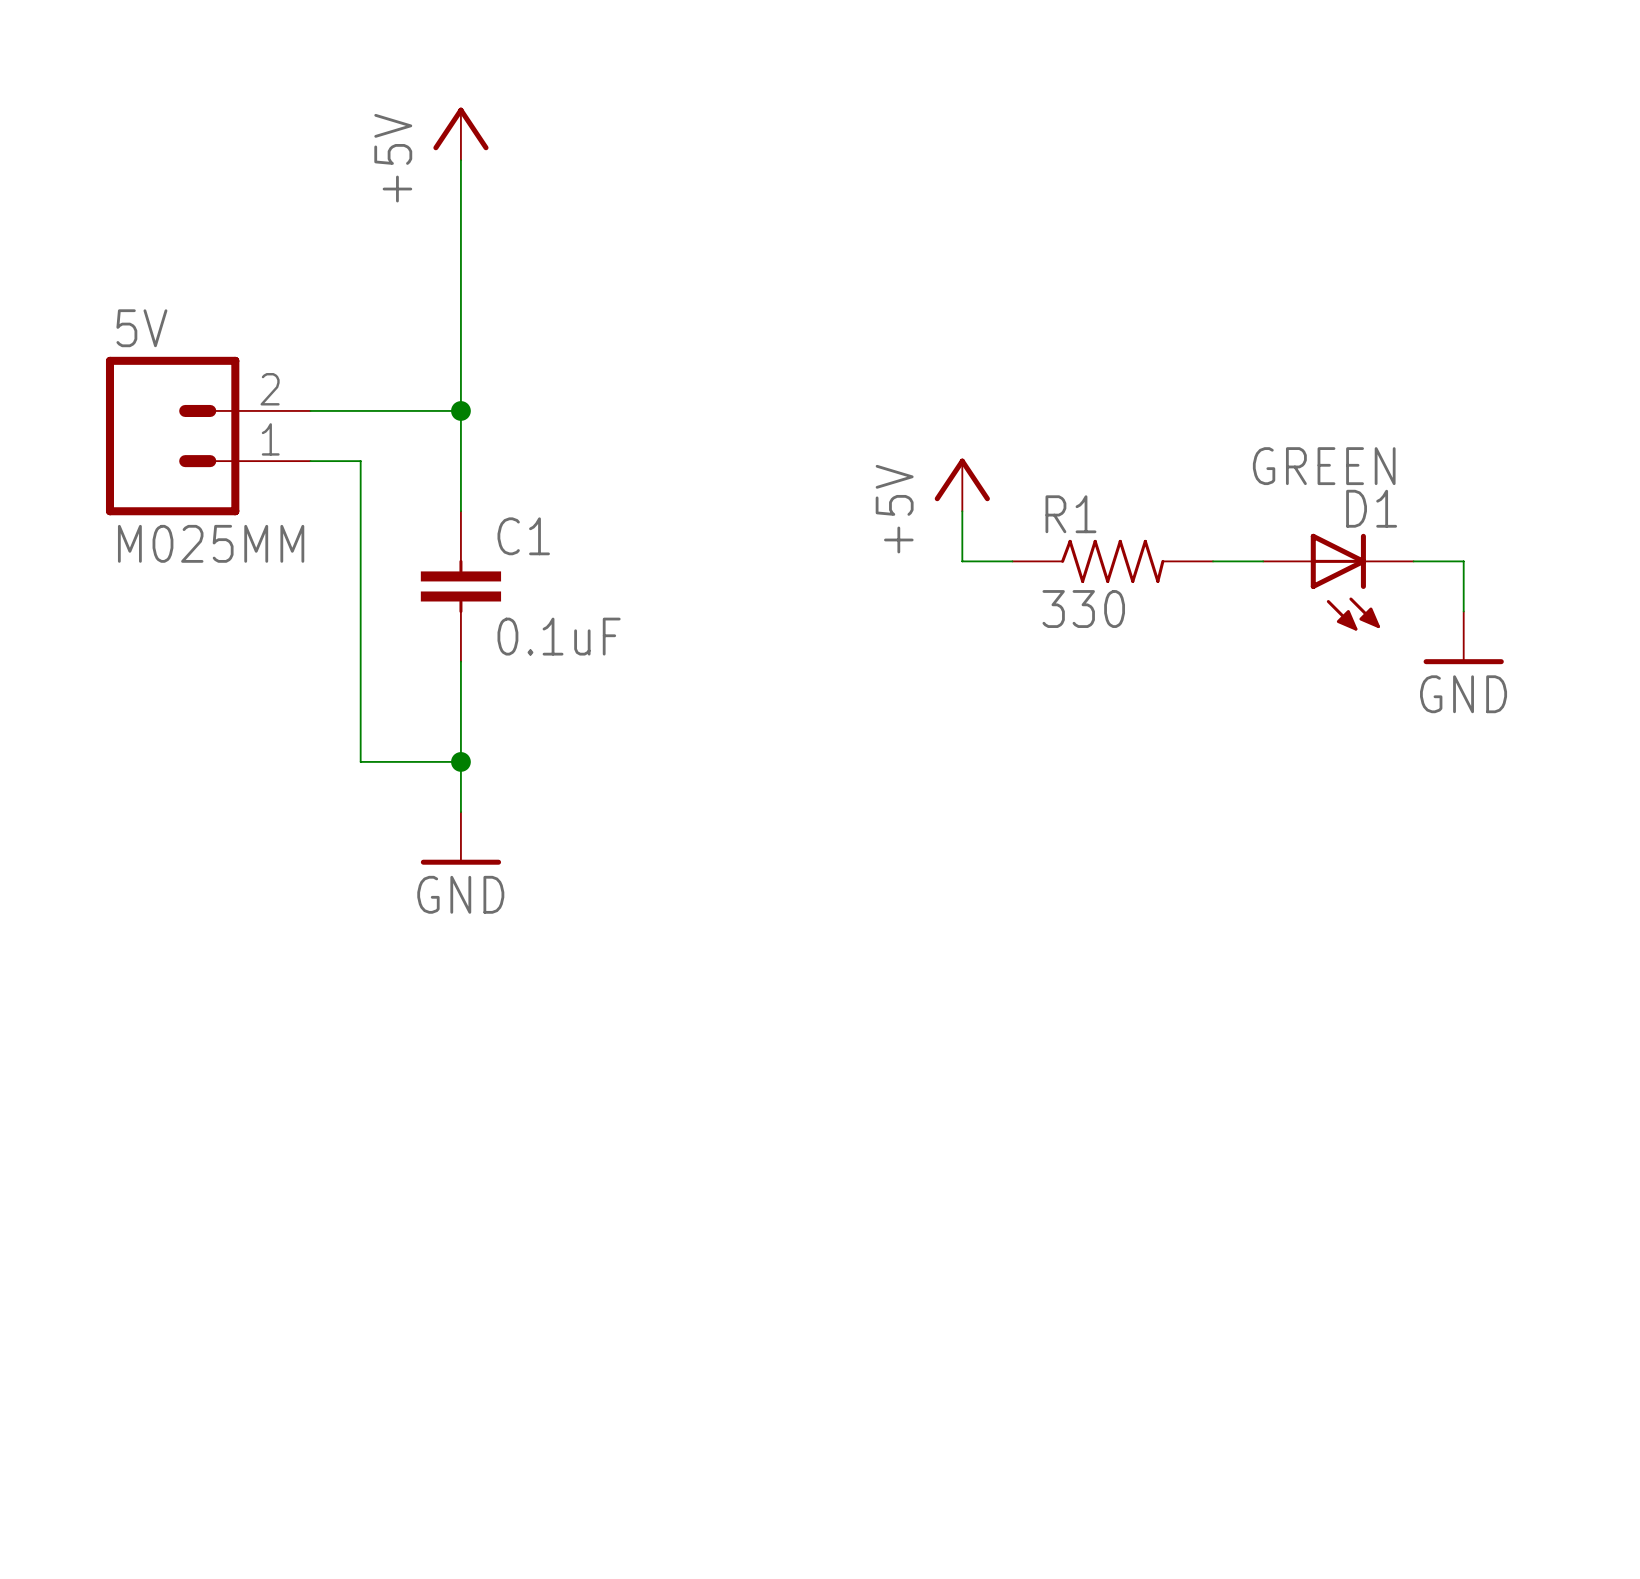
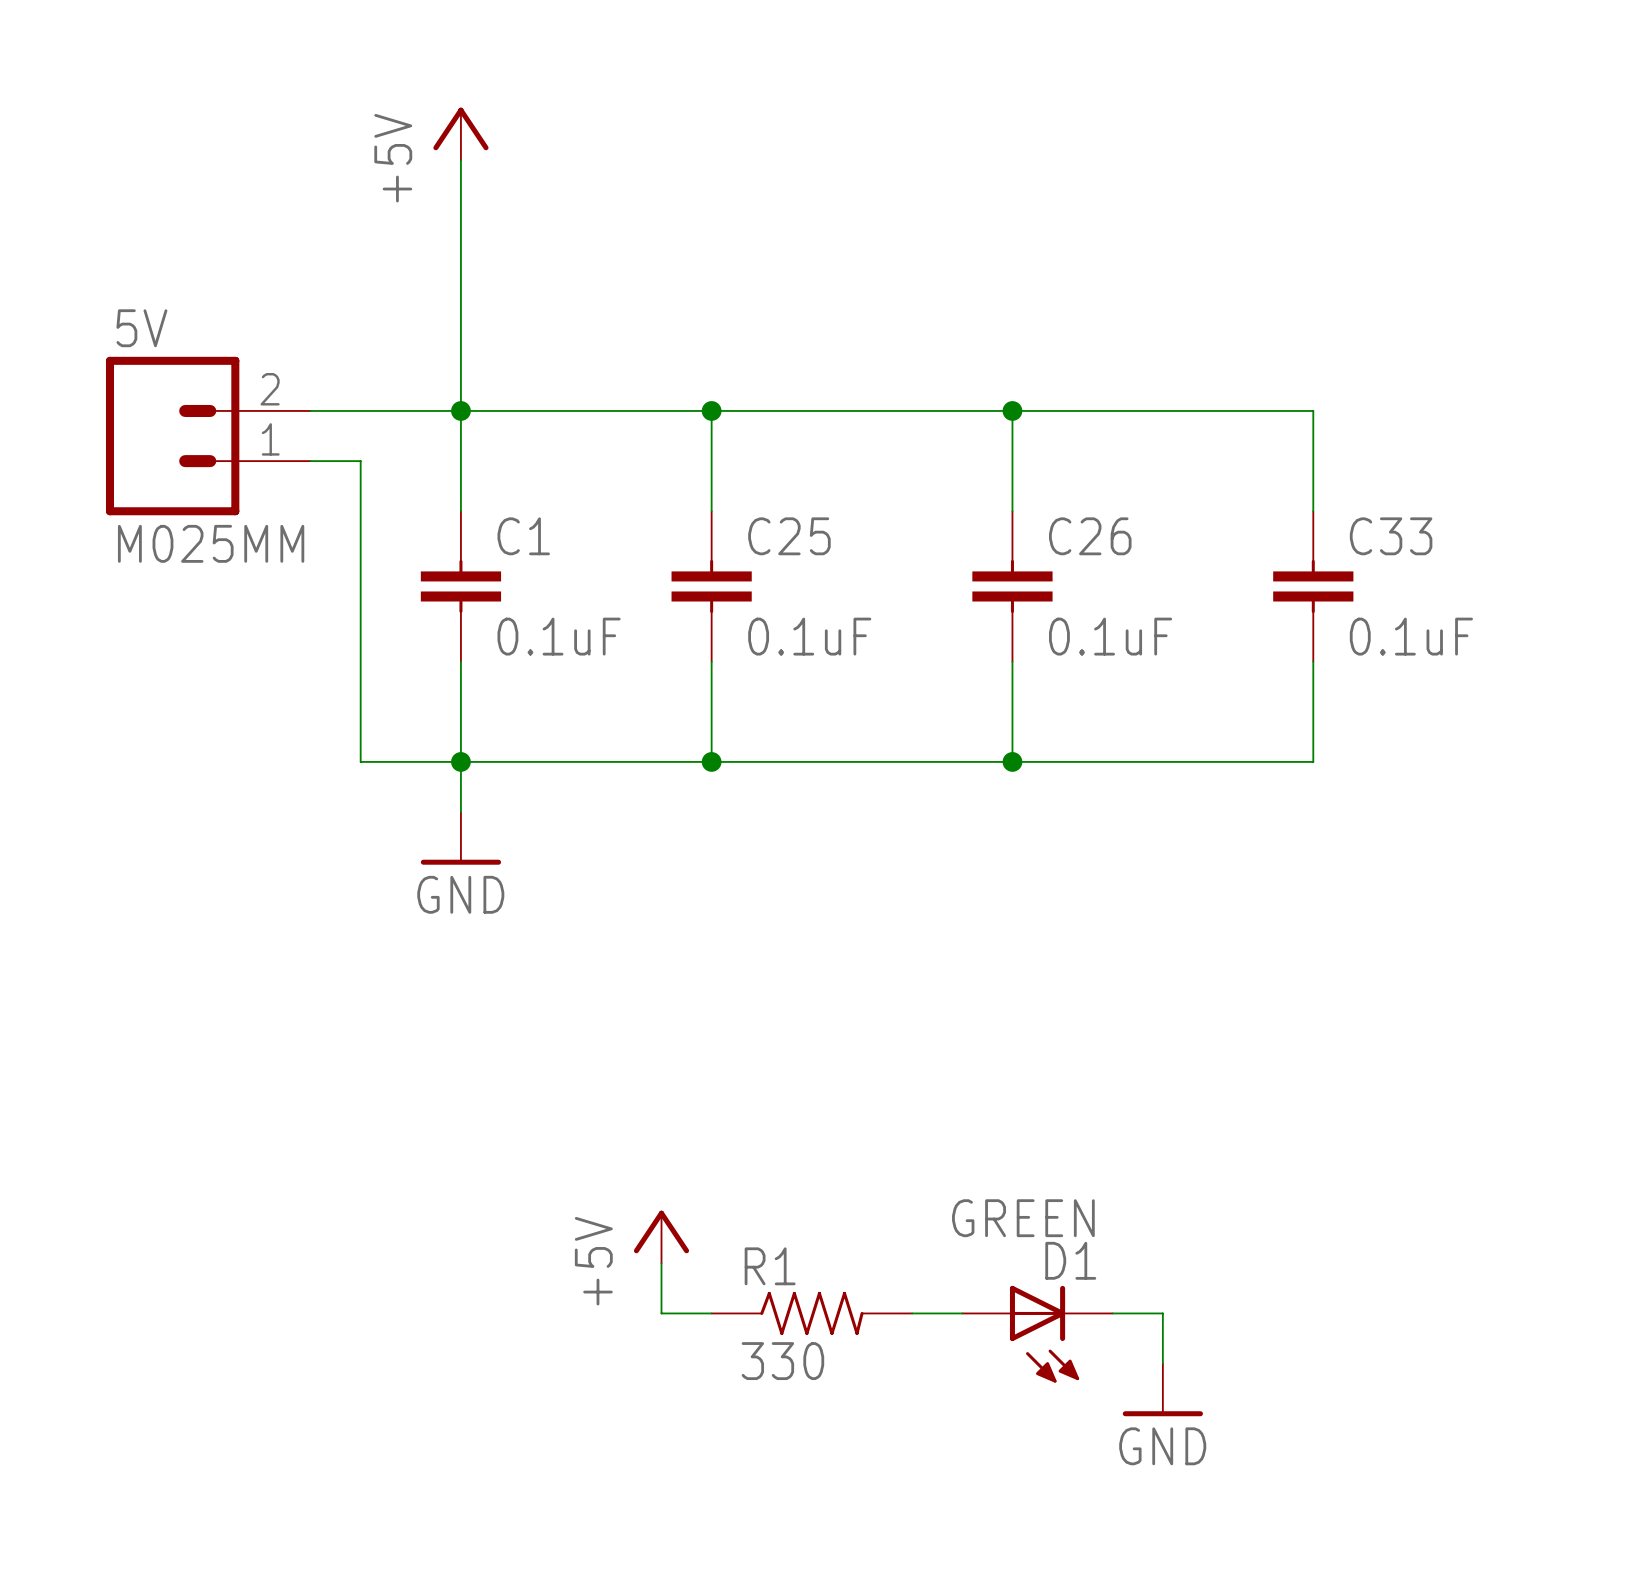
wire: none -> (460, 410) (1313, 410) (1313, 511)
wire: none -> (711, 410) (711, 511)
junction: none -> (711, 410)
wire: none -> (1012, 410) (1012, 511)
junction: none -> (1012, 410)
power symbol: +5V (962, 484) -> none
wire: (962, 511) (962, 561) (1012, 561) -> none
R1 position: (1112, 561) -> (811, 1313)
wire: (1213, 561) (1263, 561) -> none
wire: (1413, 561) (1463, 561) (1463, 611) -> none
D1 position: (1338, 582) -> (1037, 1334)
C25: none -> 0.1uF (711, 586)
C26: none -> 0.1uF (1012, 586)
C33: none -> 0.1uF (1313, 586)
power symbol: GND (1463, 637) -> none
wire: none -> (711, 661) (711, 761)
wire: none -> (1012, 661) (1012, 761)
wire: none -> (1313, 661) (1313, 761) (460, 761)
junction: none -> (711, 761)
junction: none -> (1012, 761)
power symbol: none -> +5V (661, 1236)
wire: none -> (661, 1263) (661, 1313) (711, 1313)
wire: none -> (912, 1313) (962, 1313)
wire: none -> (1112, 1313) (1162, 1313) (1162, 1363)
power symbol: none -> GND (1162, 1389)

